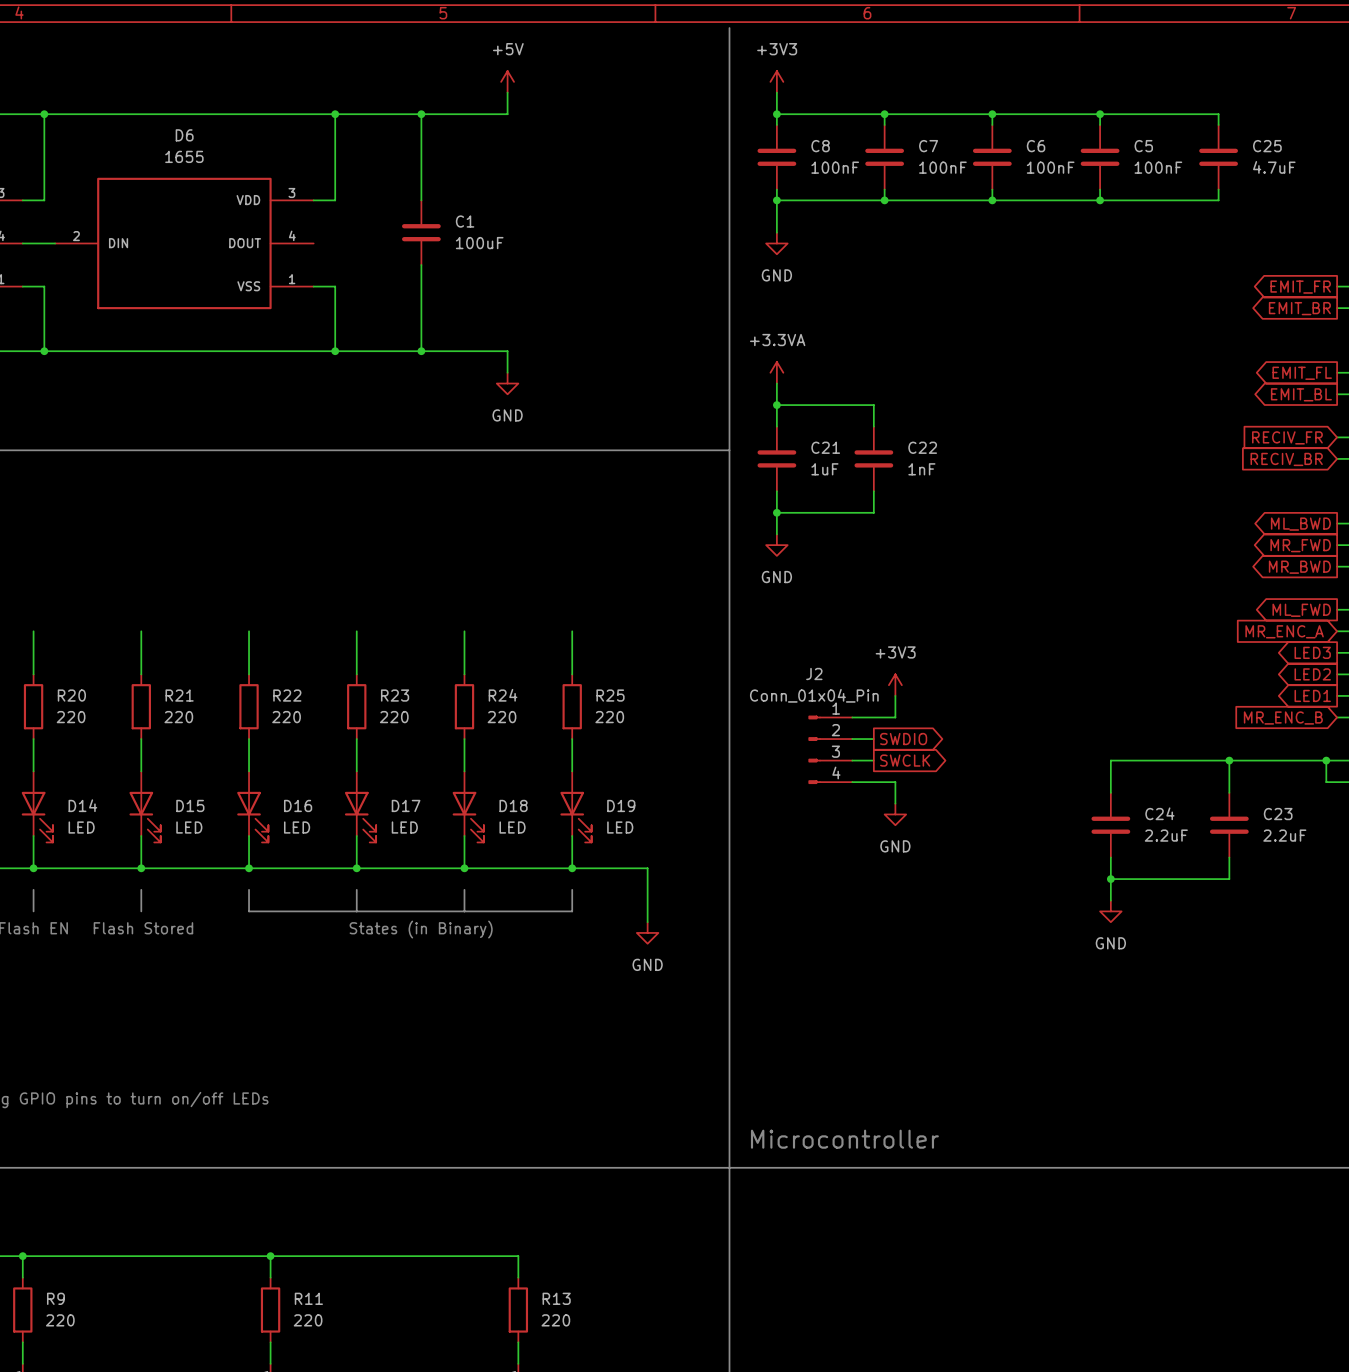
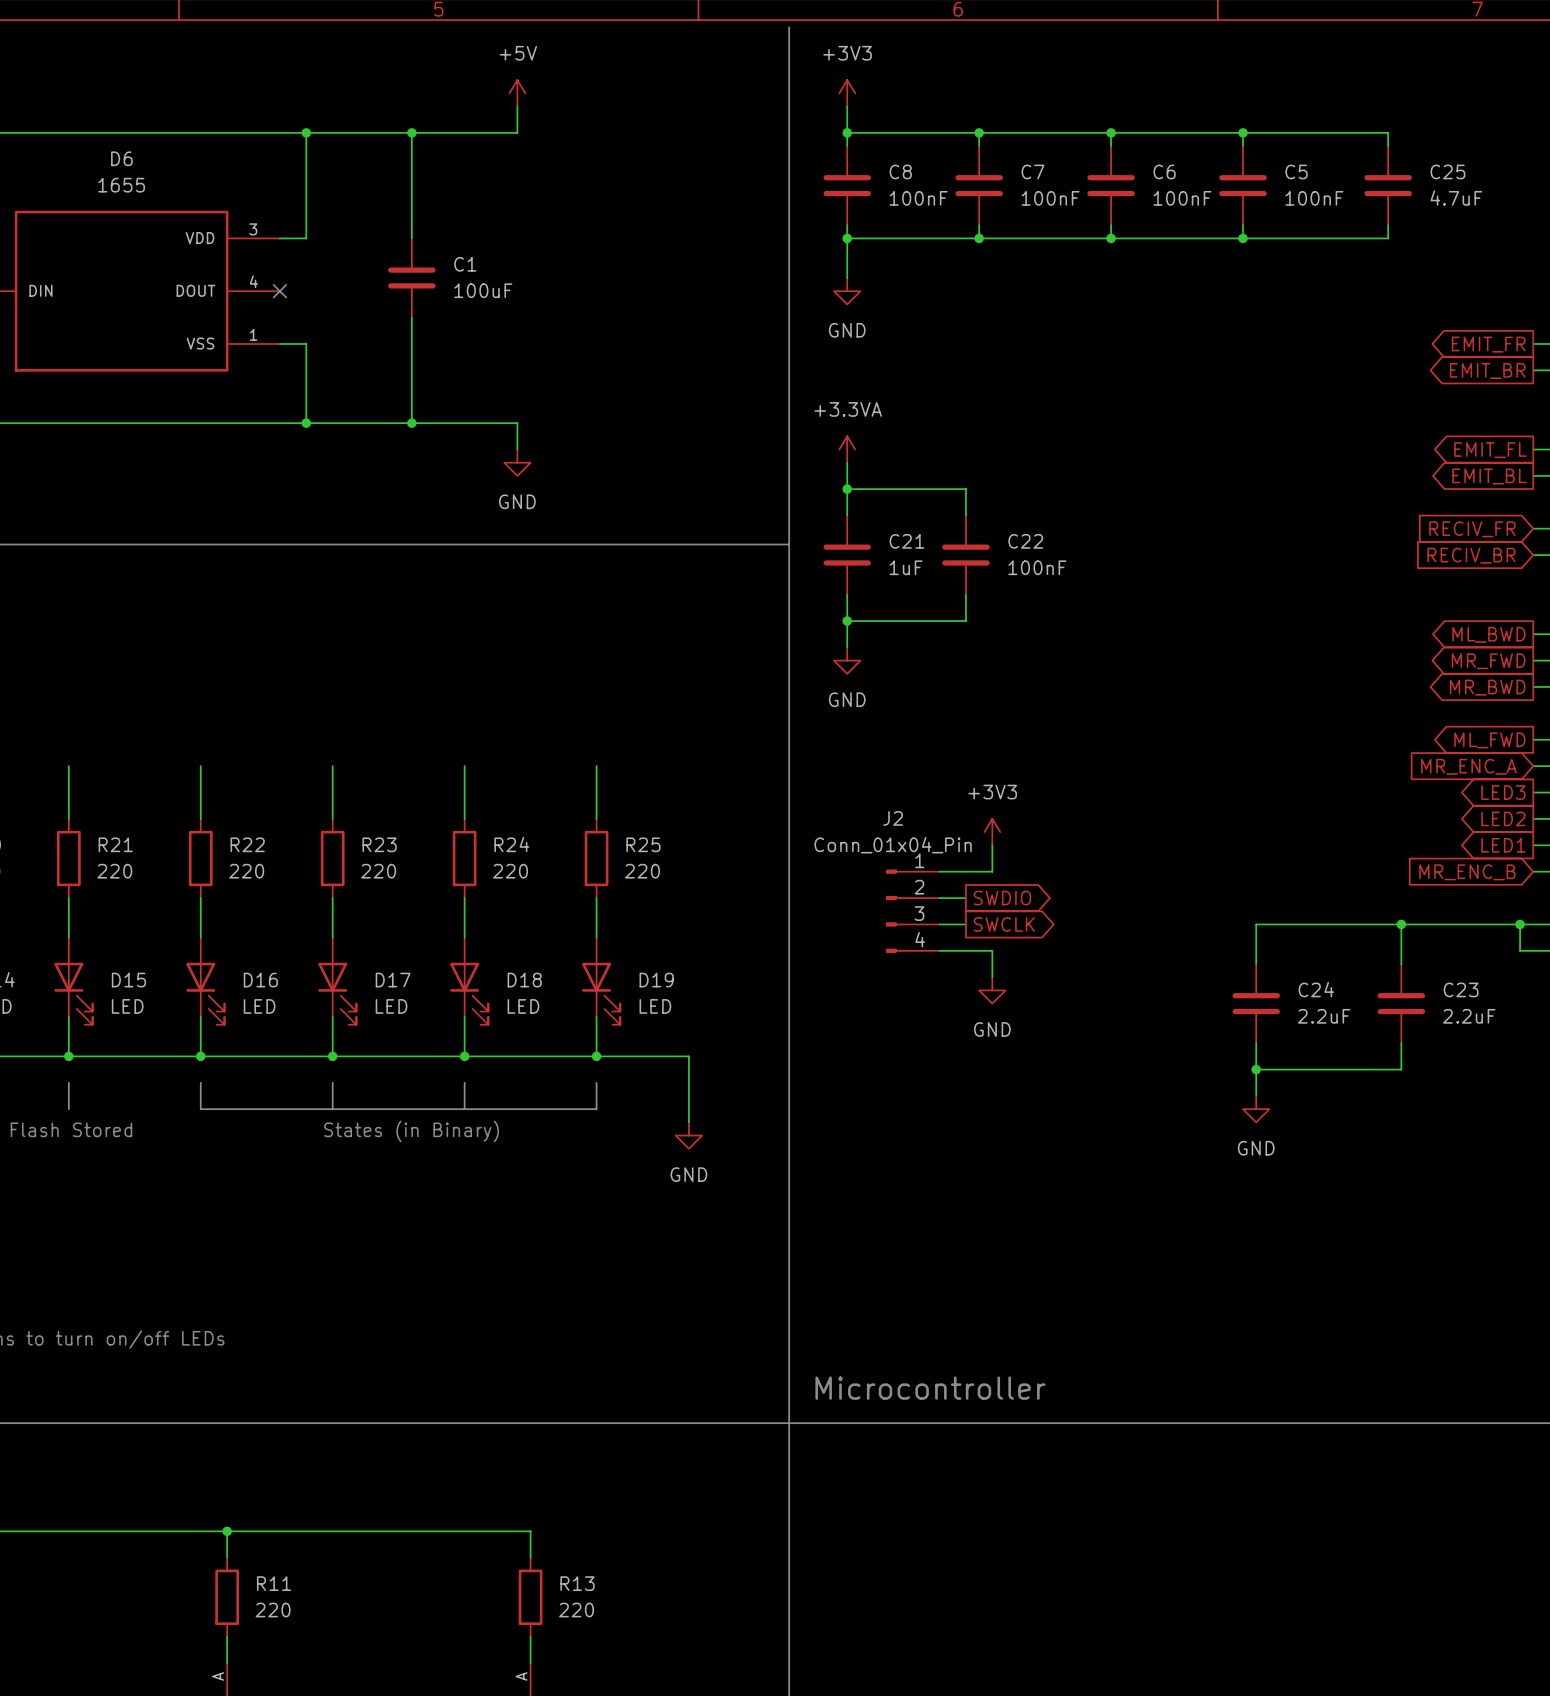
no-connect mark: none -> (279, 291)
C22 value: 1nF (921, 469) -> 100nF (1037, 567)

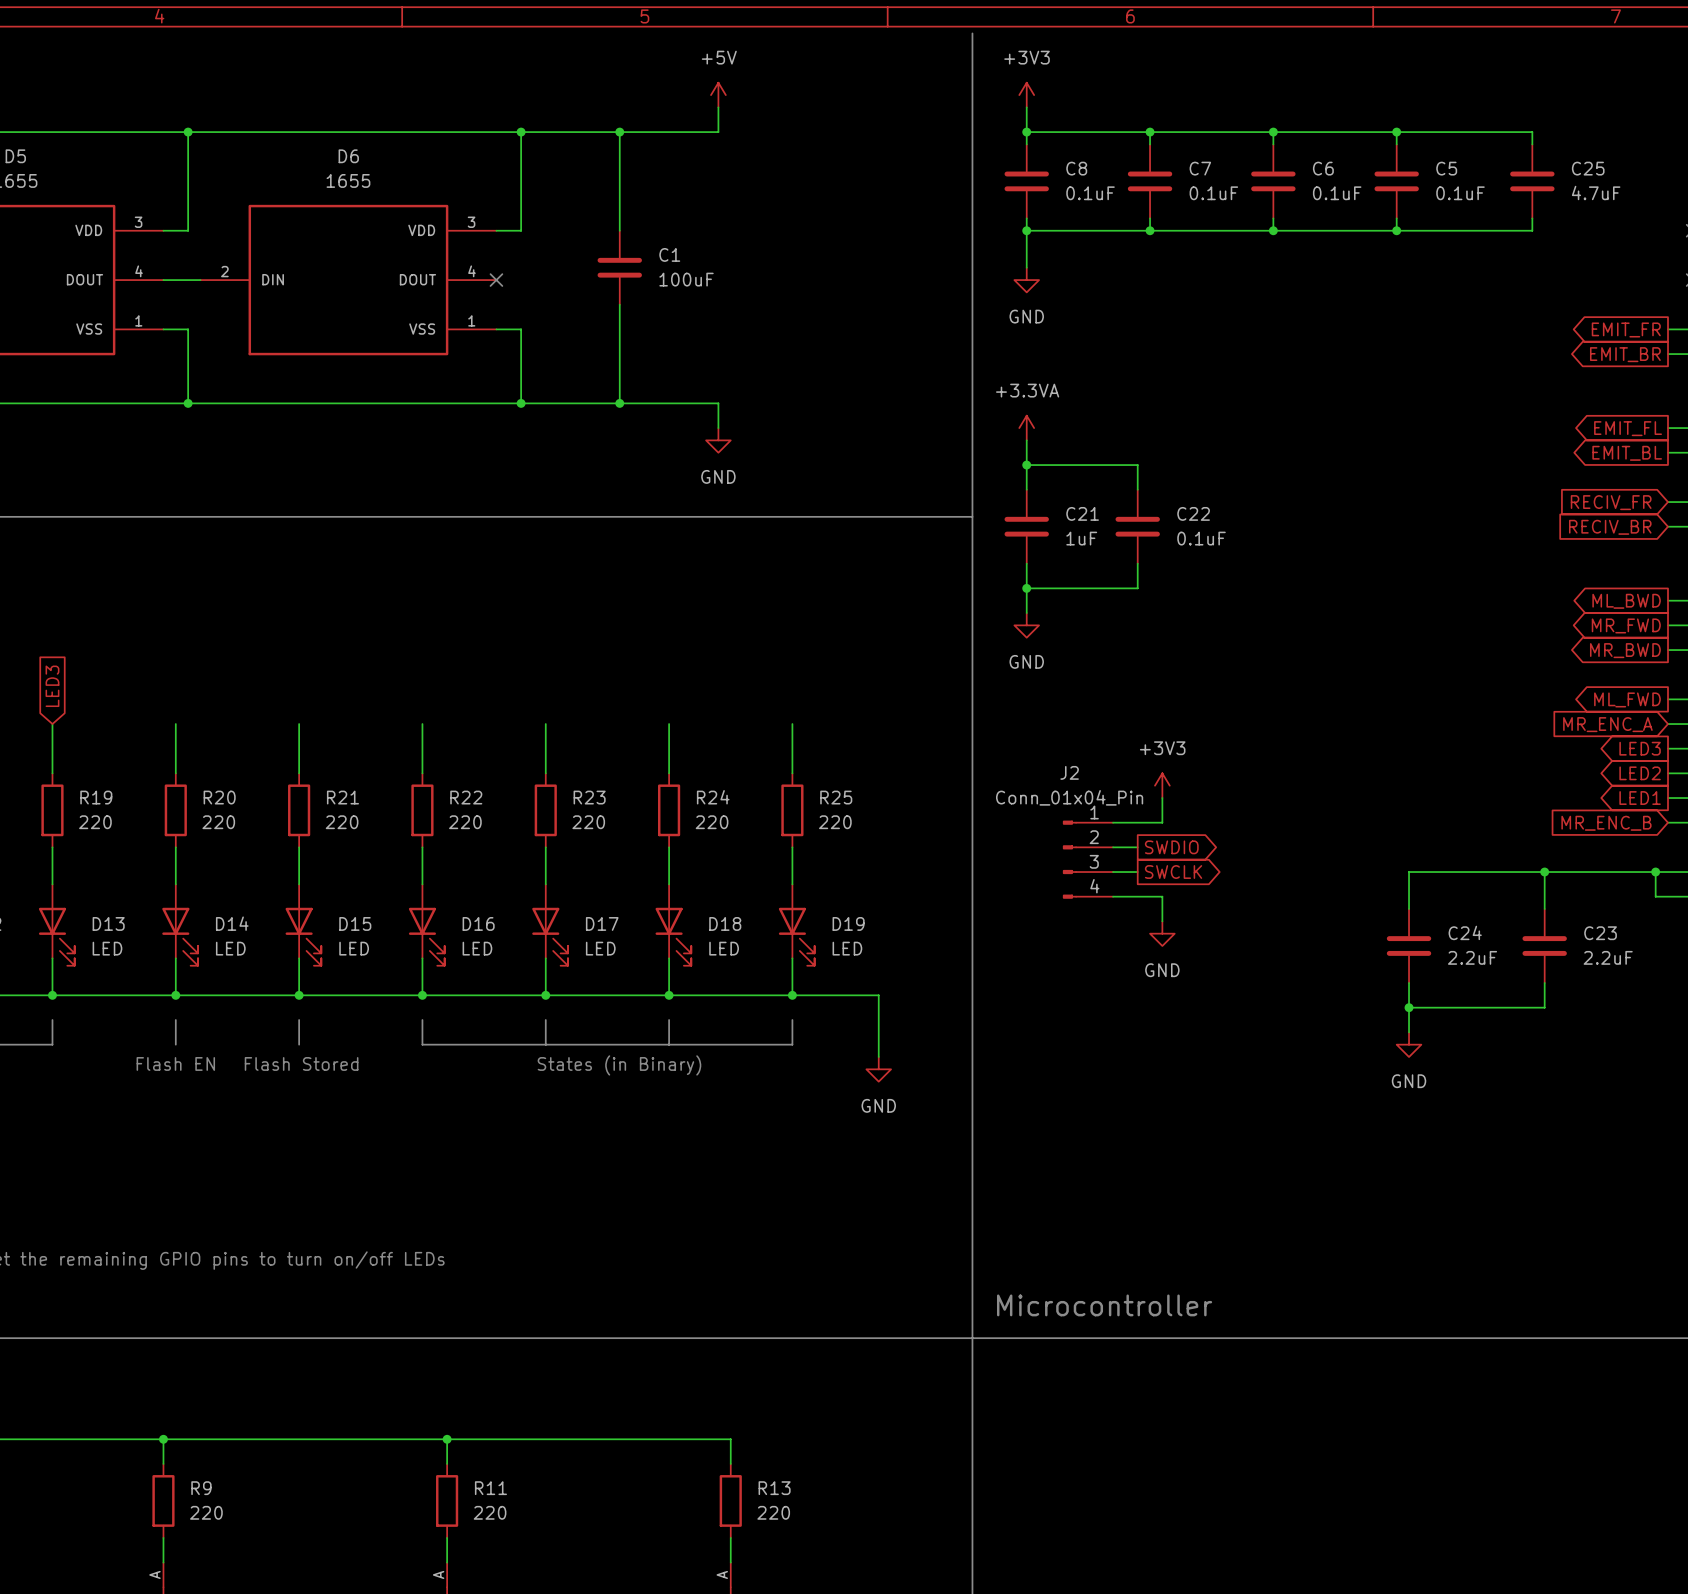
C8 value: 100nF (918, 198) -> 0.1uF (1090, 193)
C7 value: 100nF (1050, 198) -> 0.1uF (1213, 193)
C6 value: 100nF (1182, 198) -> 0.1uF (1337, 193)
C5 value: 100nF (1314, 198) -> 0.1uF (1460, 193)
C22 value: 100nF (1037, 567) -> 0.1uF (1201, 538)

